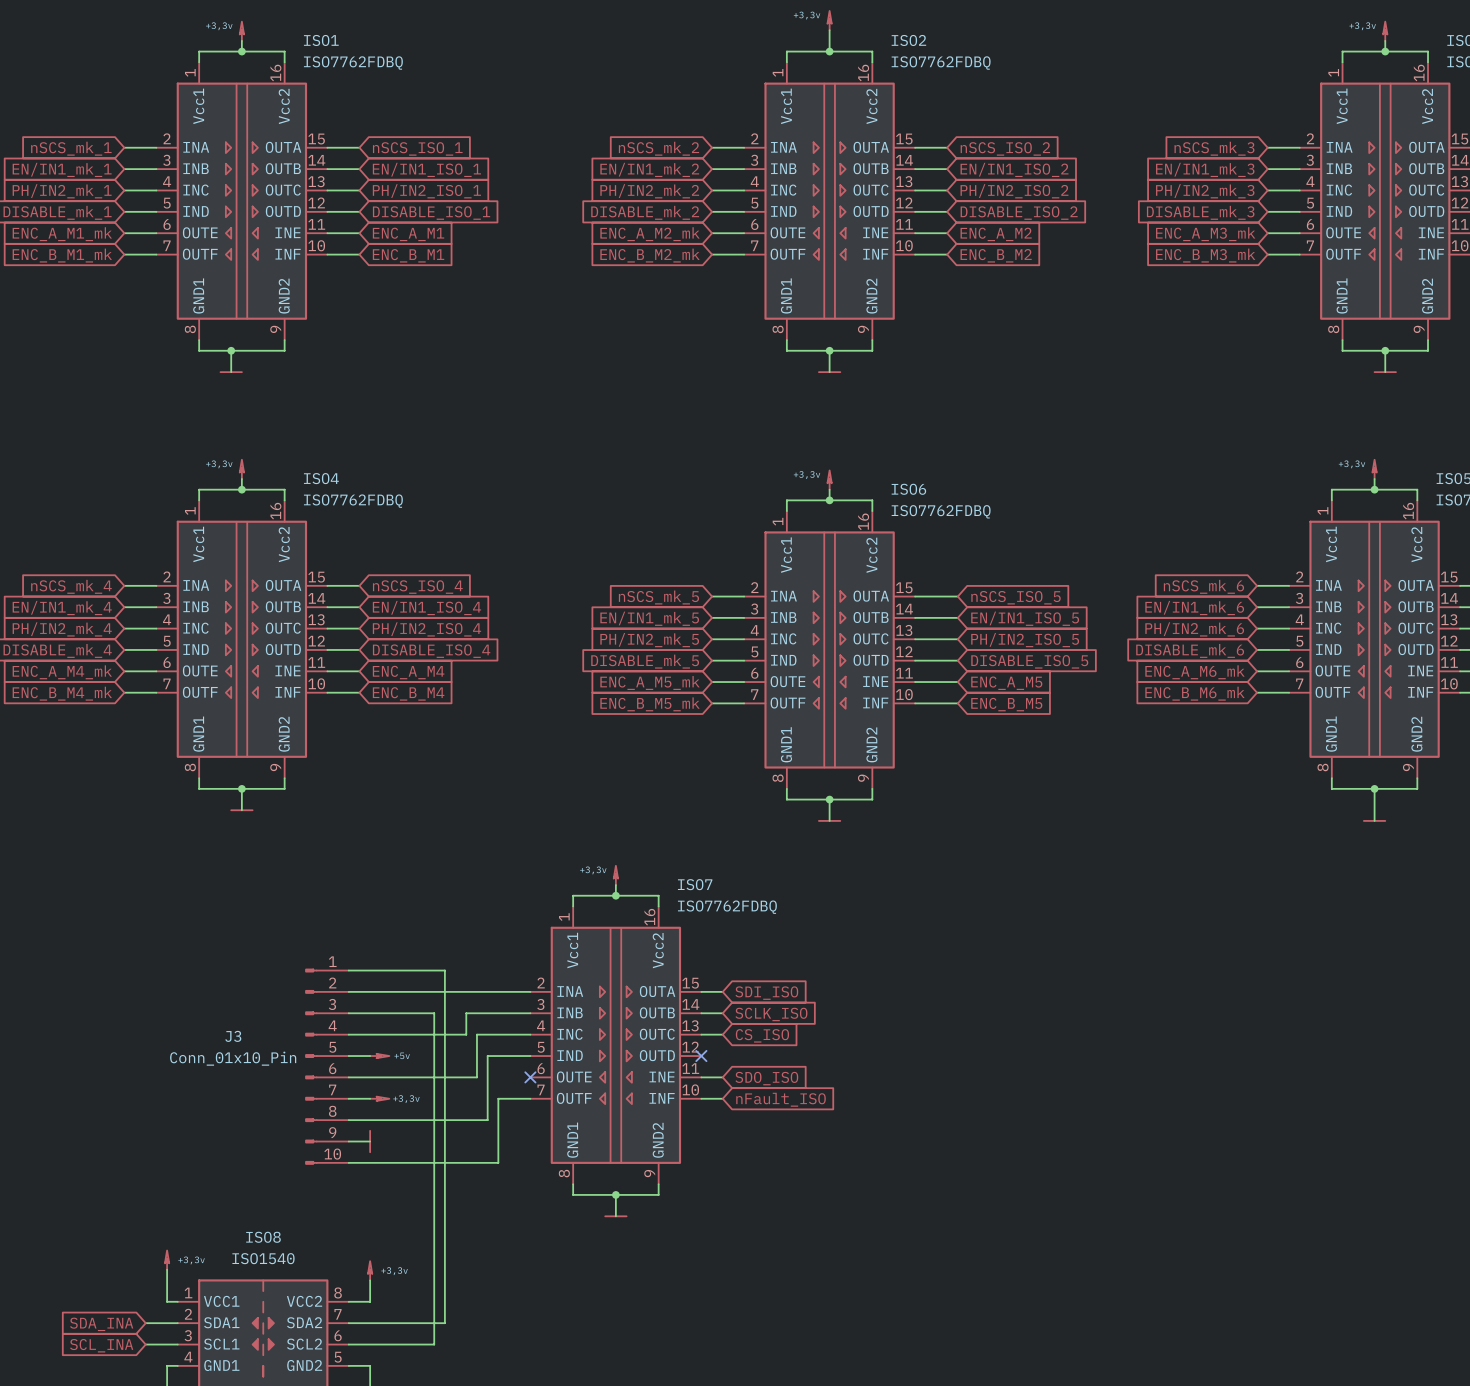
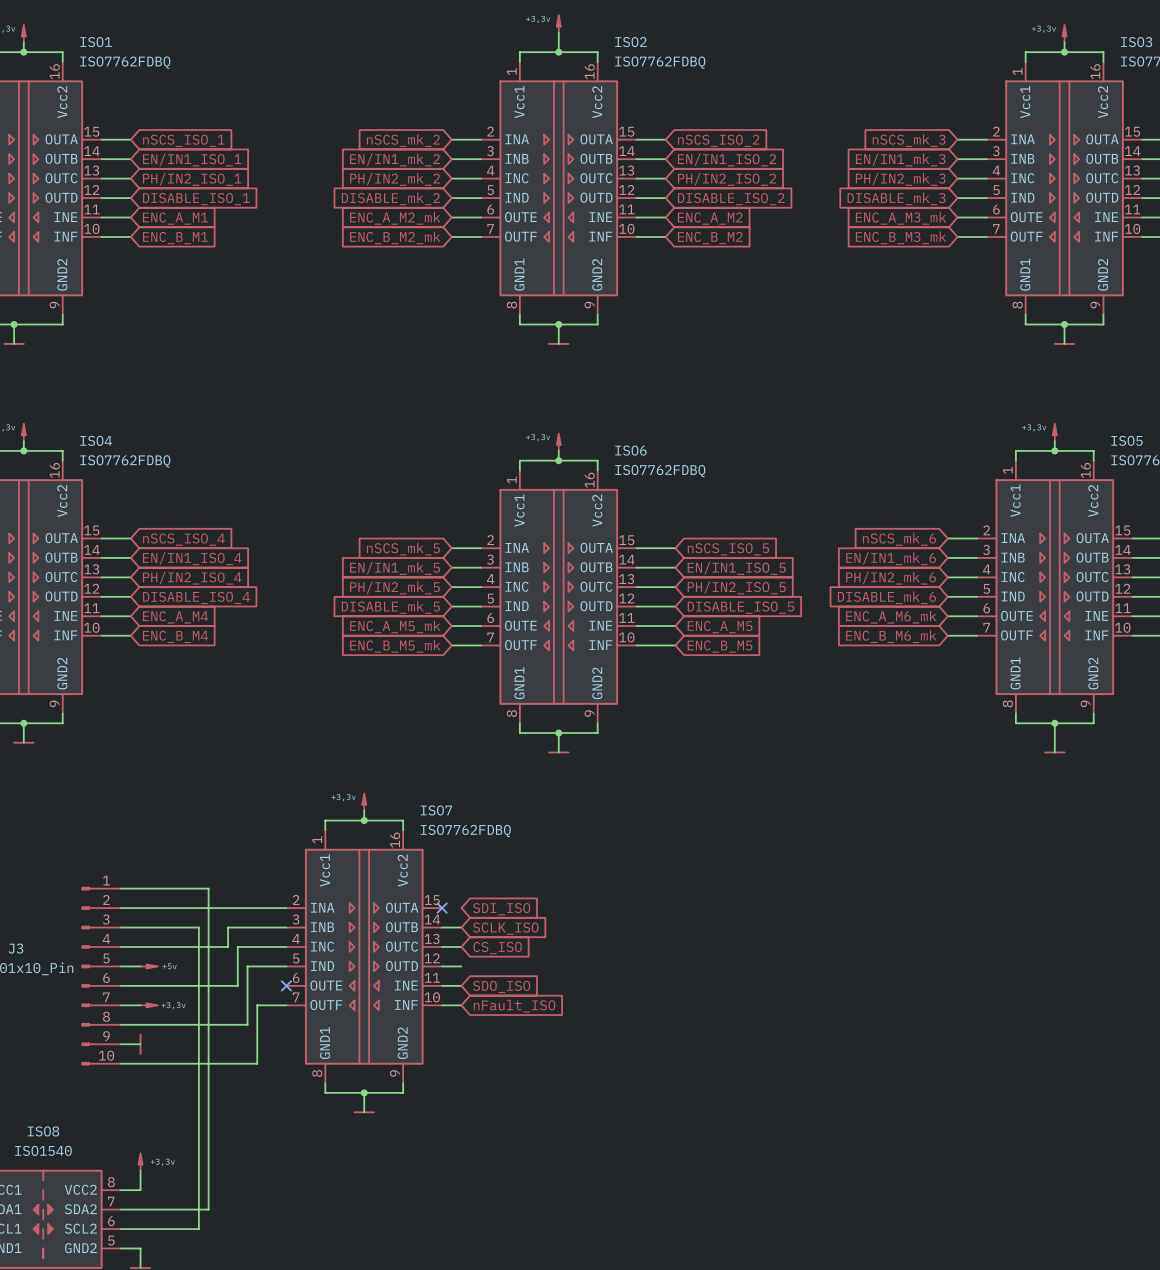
wire: (701, 991) (722, 991) -> (442, 966) (461, 966)
no-connect mark: none -> (442, 908)
no-connect mark: (701, 1056) -> none

